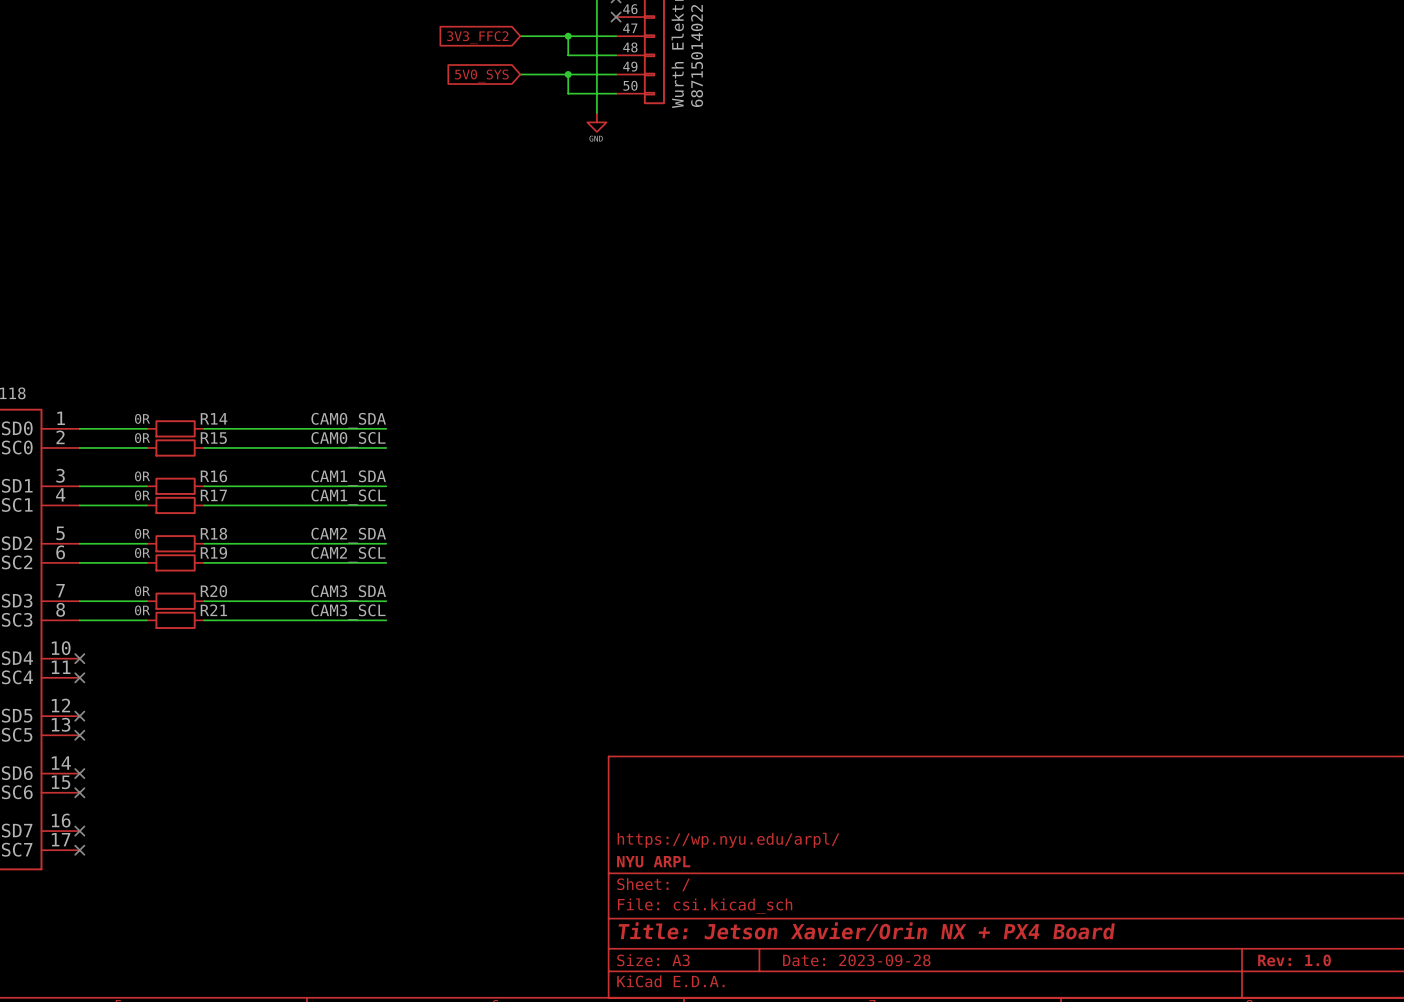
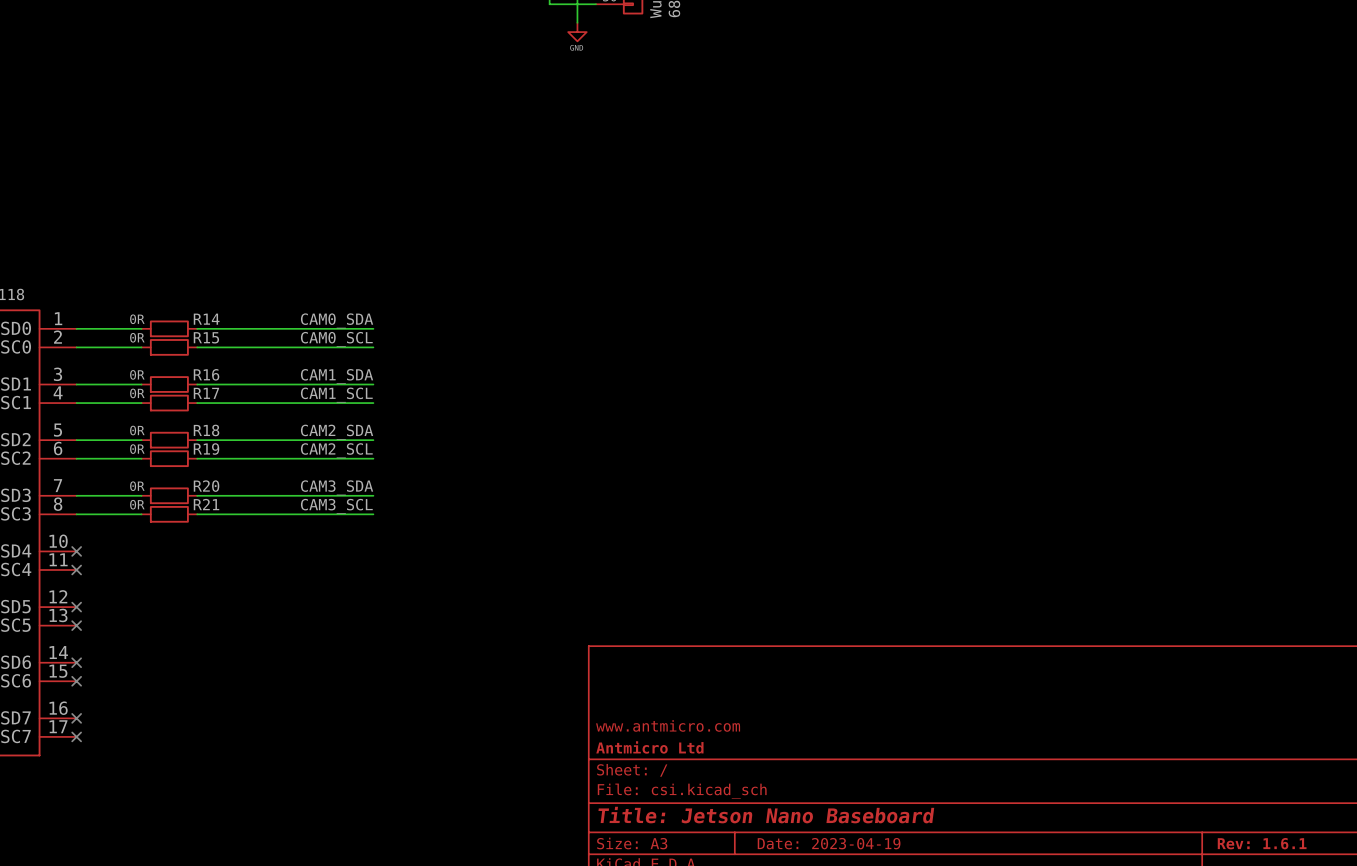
title block: https://wp.nyu.edu/arpl/ (728, 840) -> www.antmicro.com (668, 725)
title block: NYU ARPL (653, 861) -> Antmicro Ltd (649, 747)
title block: Title: Jetson Xavier/Orin NX + PX4 Board (866, 931) -> Title: Jetson Nano Baseboard (766, 815)
title block: Date: 2023-09-28 (856, 960) -> Date: 2023-04-19 (829, 843)
title block: Rev: 1.0 (1294, 960) -> Rev: 1.6.1 (1262, 843)

